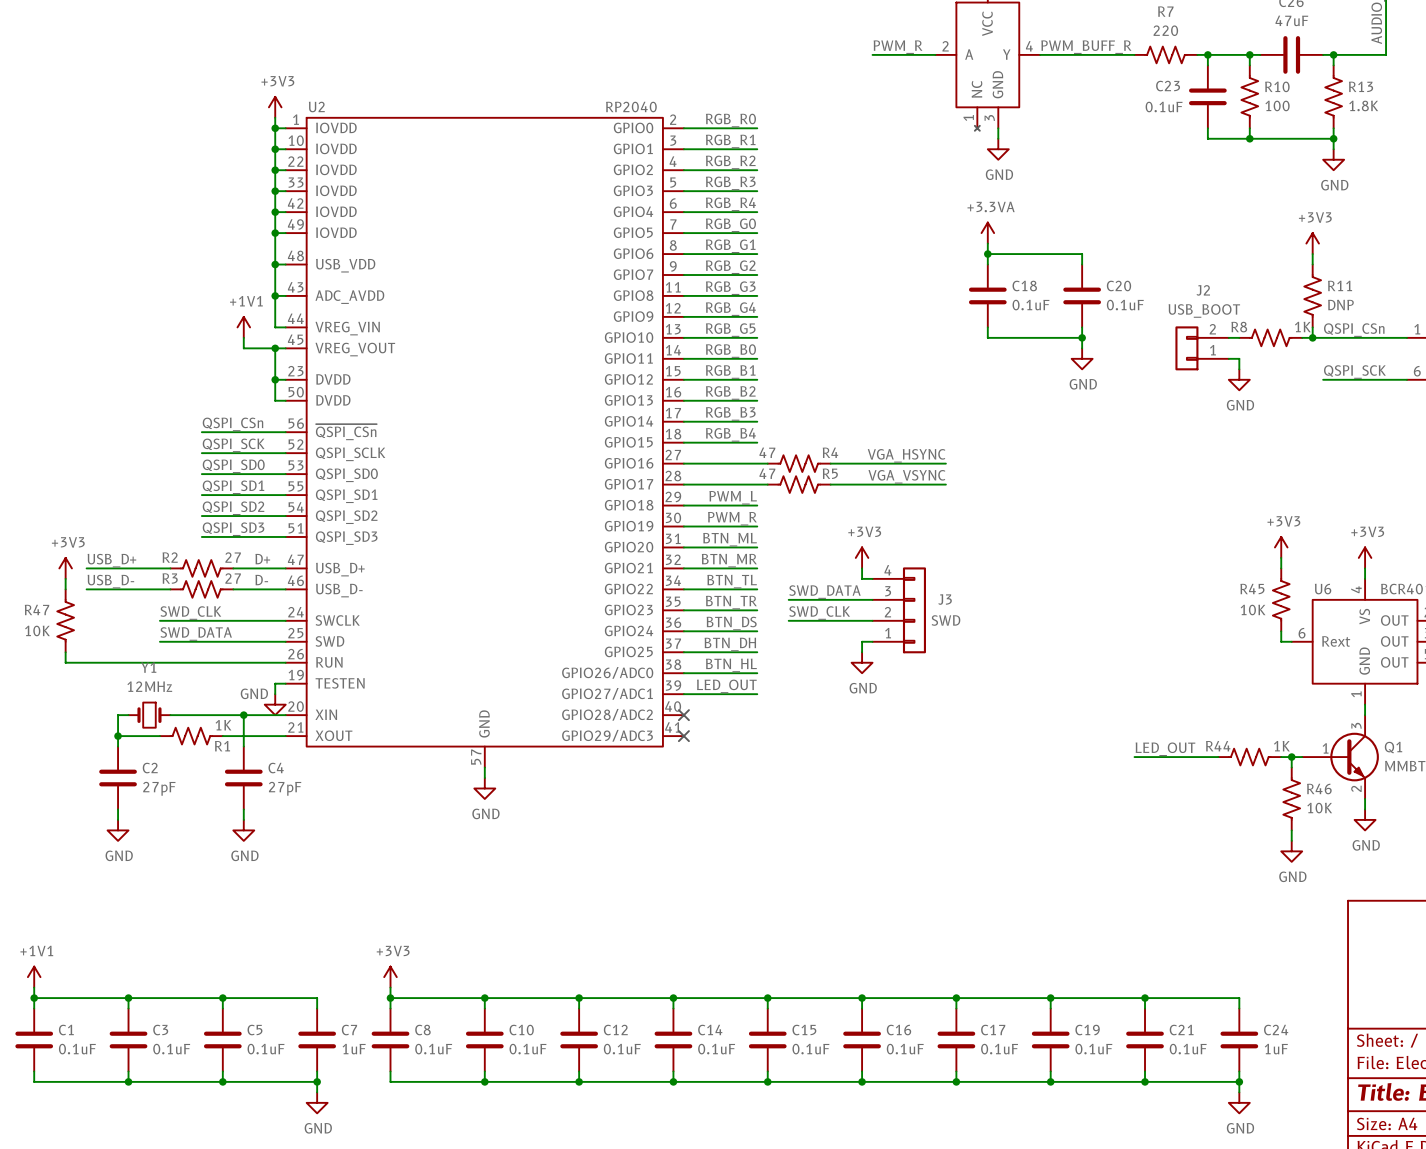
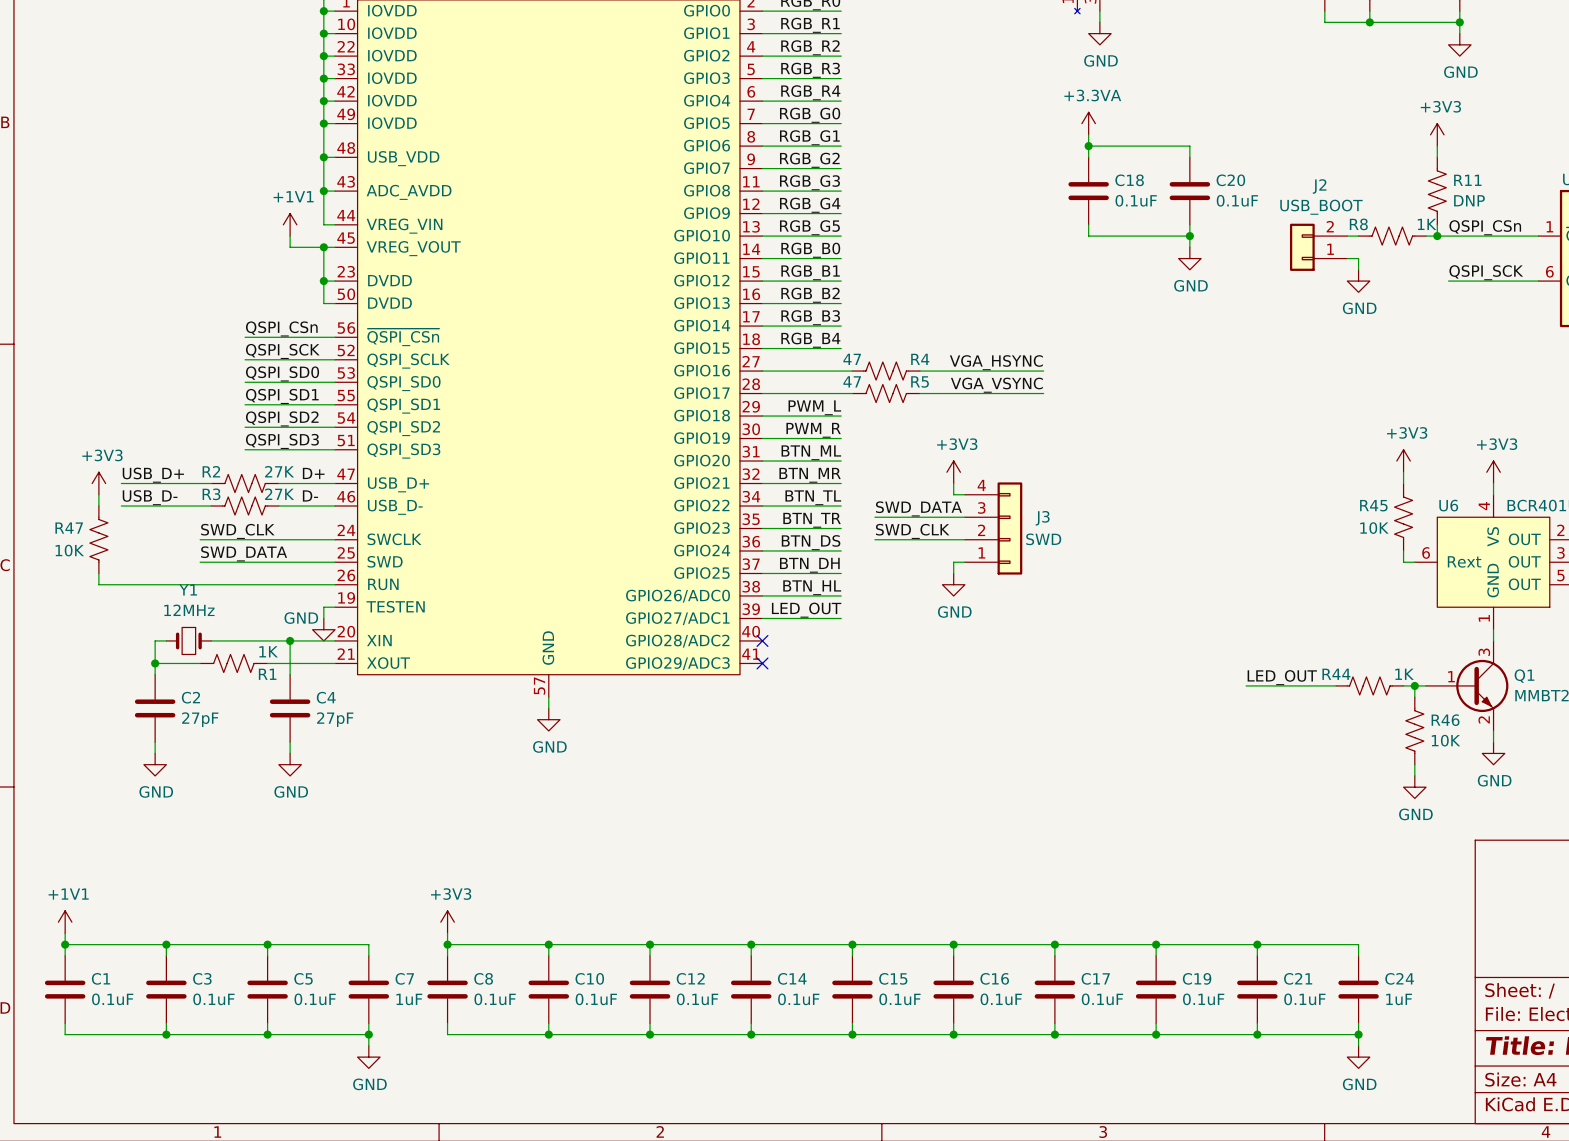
R2 value: 27 (233, 557) -> 27K (279, 471)
R3 value: 27 (233, 578) -> 27K (279, 494)

